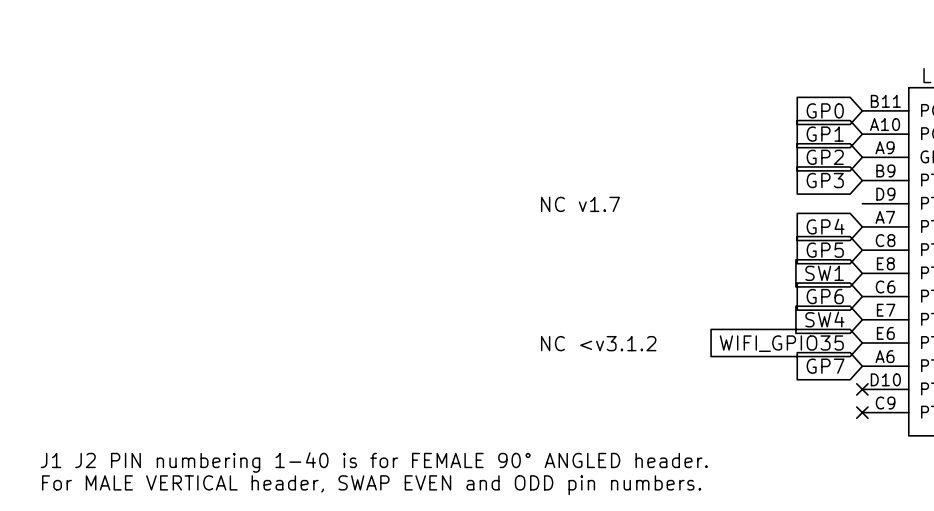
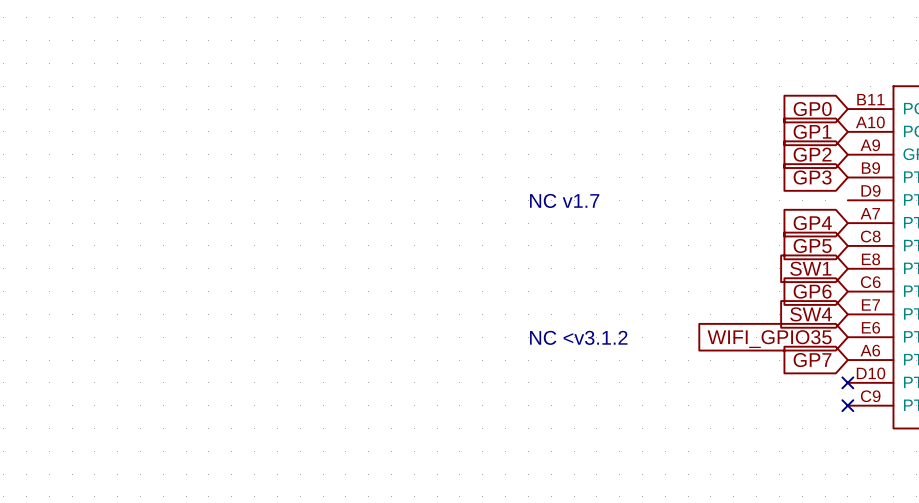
text: J1 J2 PIN numbering 1-40 is for FEMALE 90° ANGLED header. (374, 462) -> none
text: For MALE VERTICAL header, SWAP EVEN and ODD pin numbers. (371, 485) -> none

